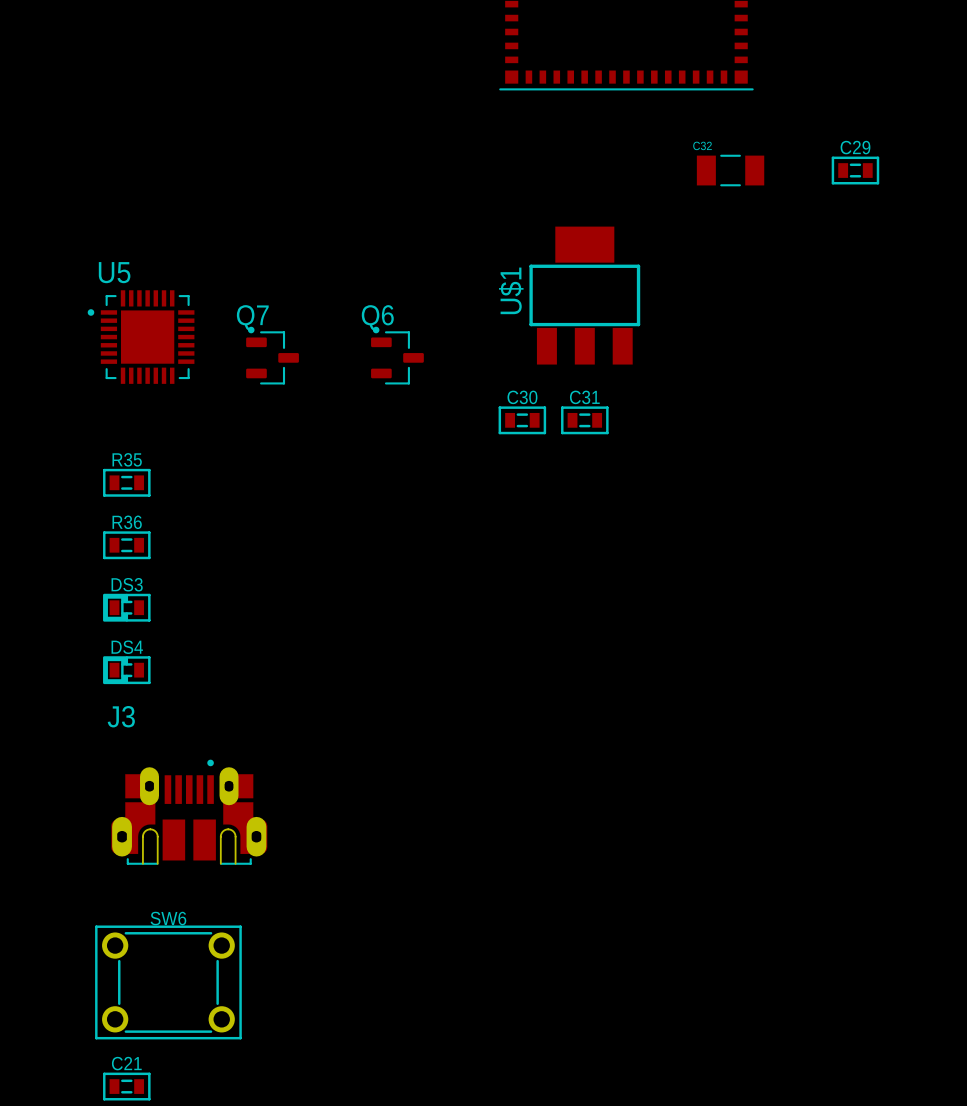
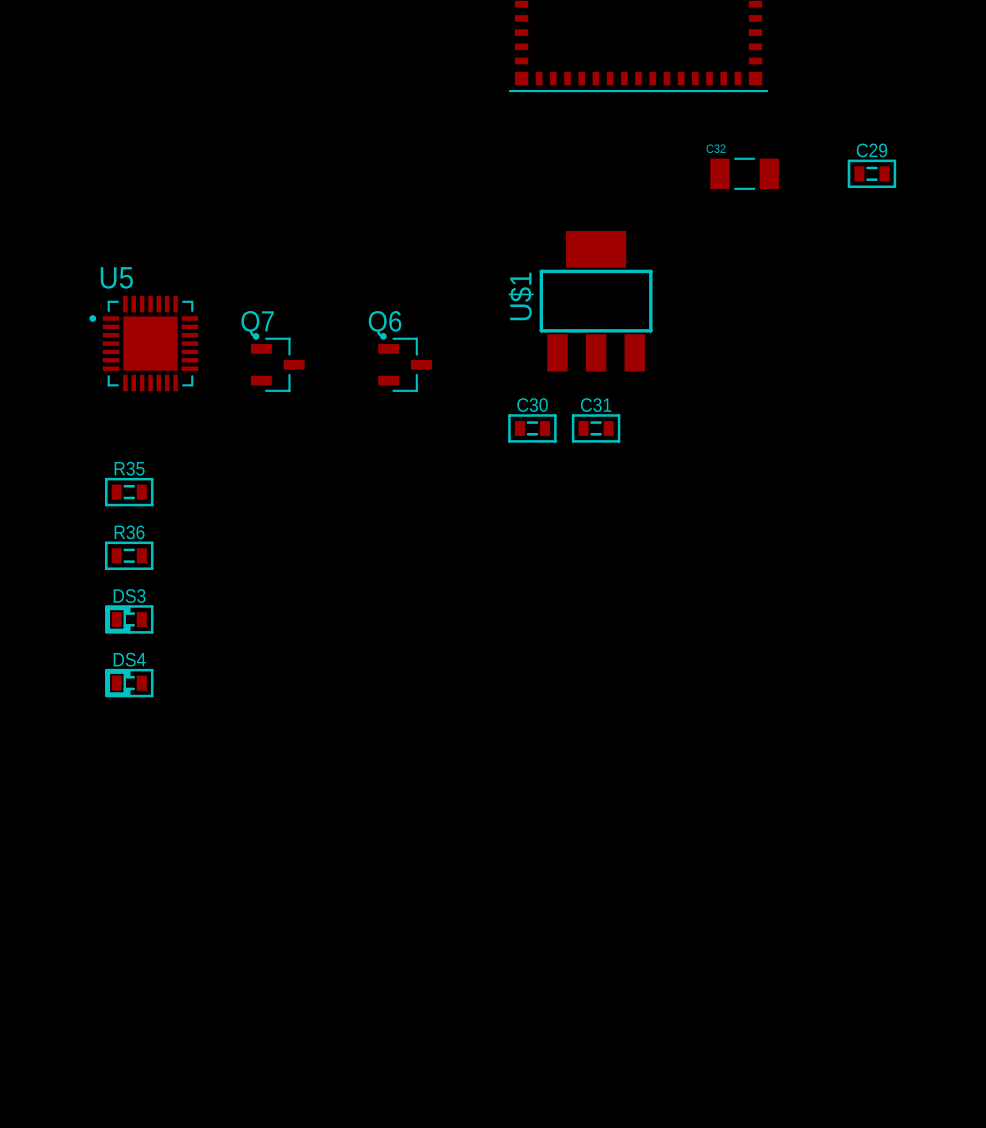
J3: (189, 812) -> none
SW6: (168, 982) -> none
C21: (126, 1086) -> none

